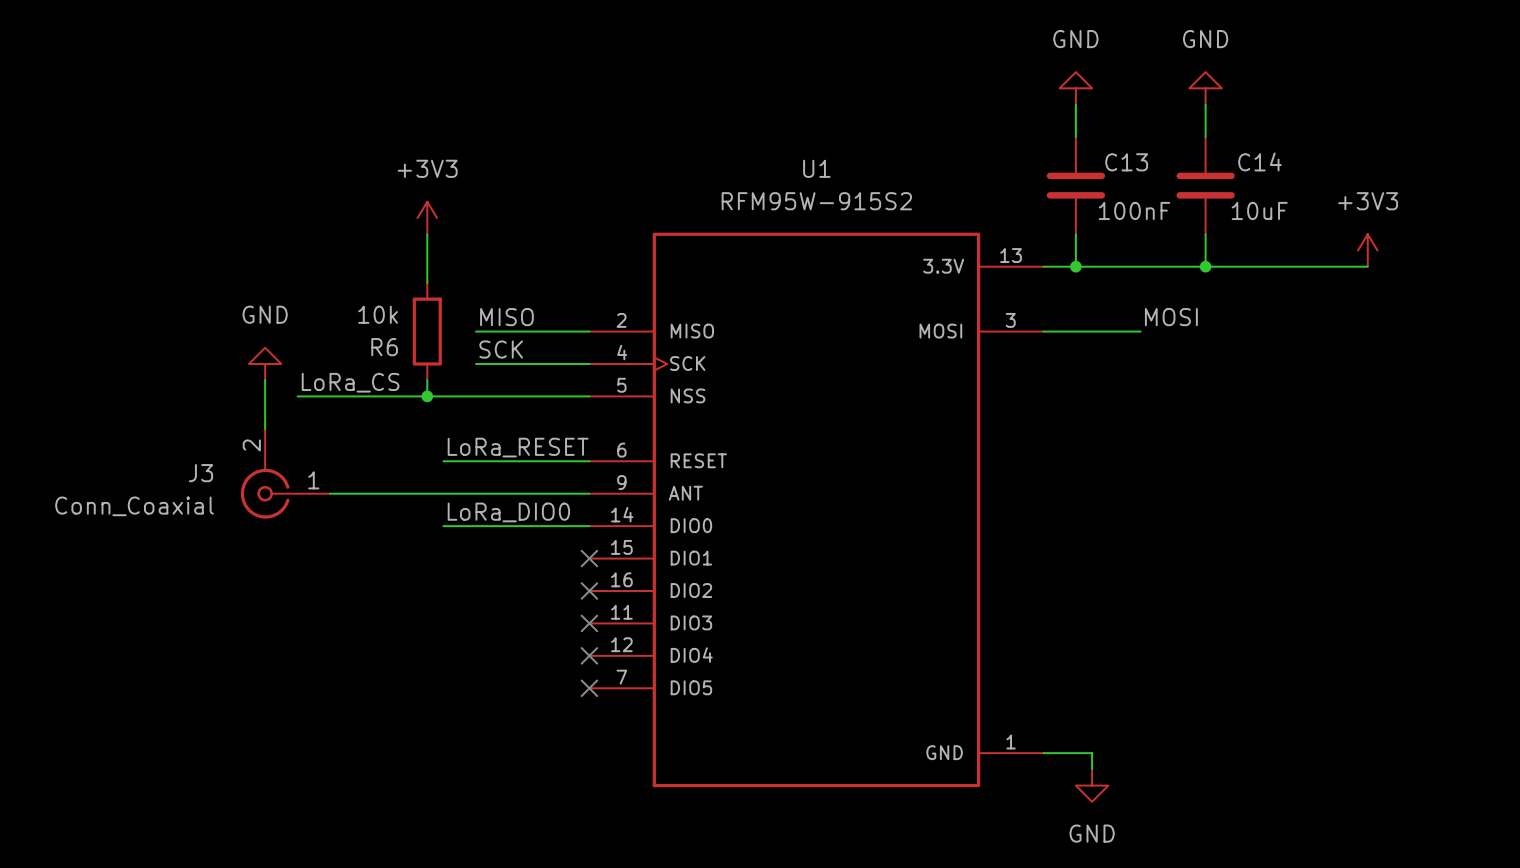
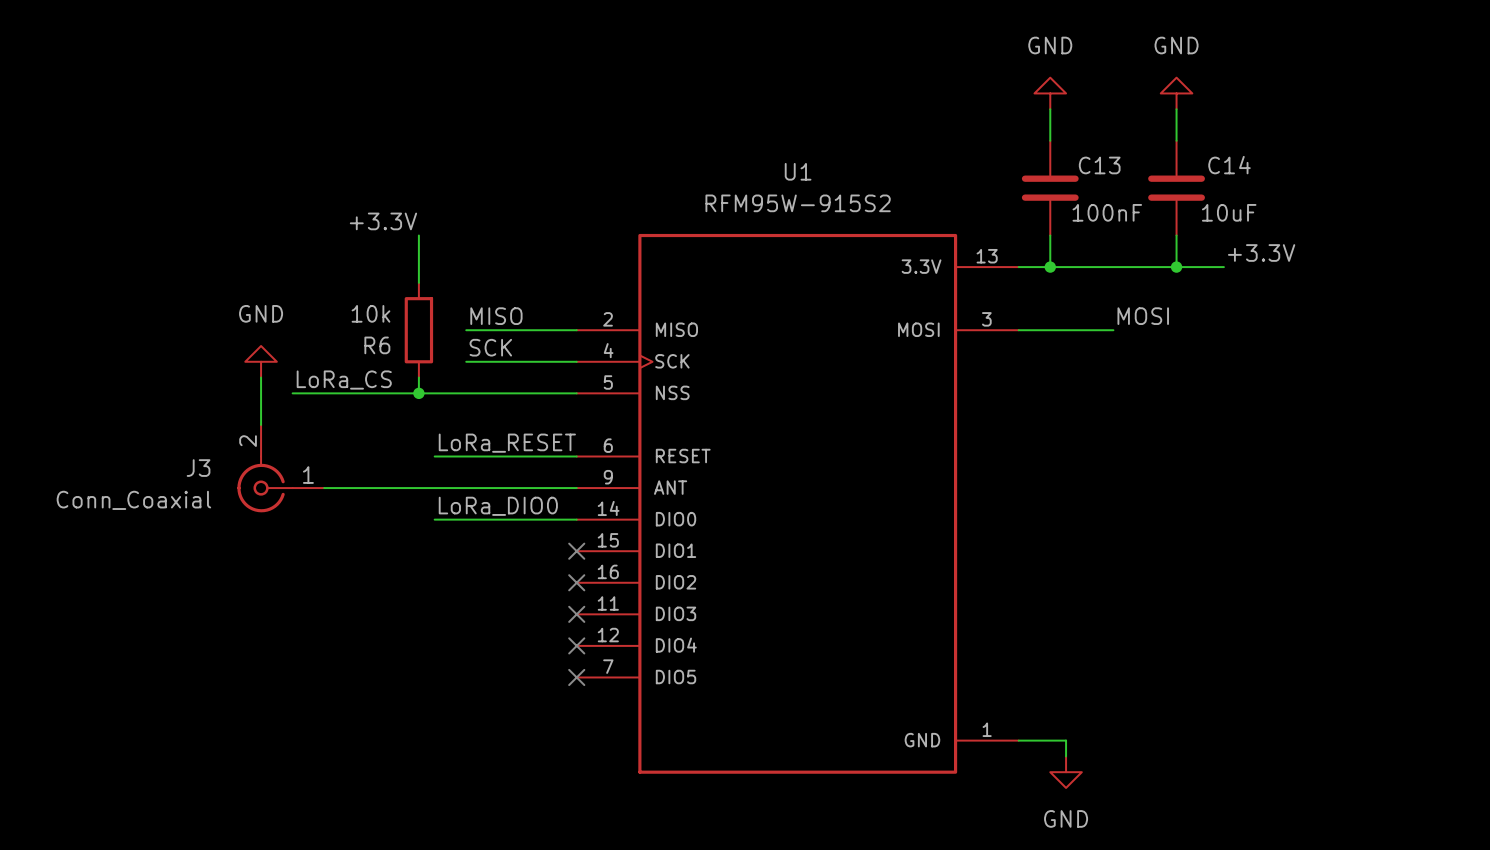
power symbol: +3V3 (427, 218) -> none
label: none -> +3.3V (383, 221)
power symbol: +3V3 (1367, 250) -> none
label: none -> +3.3V (1261, 253)
wire: (1254, 266) (1367, 266) -> none

